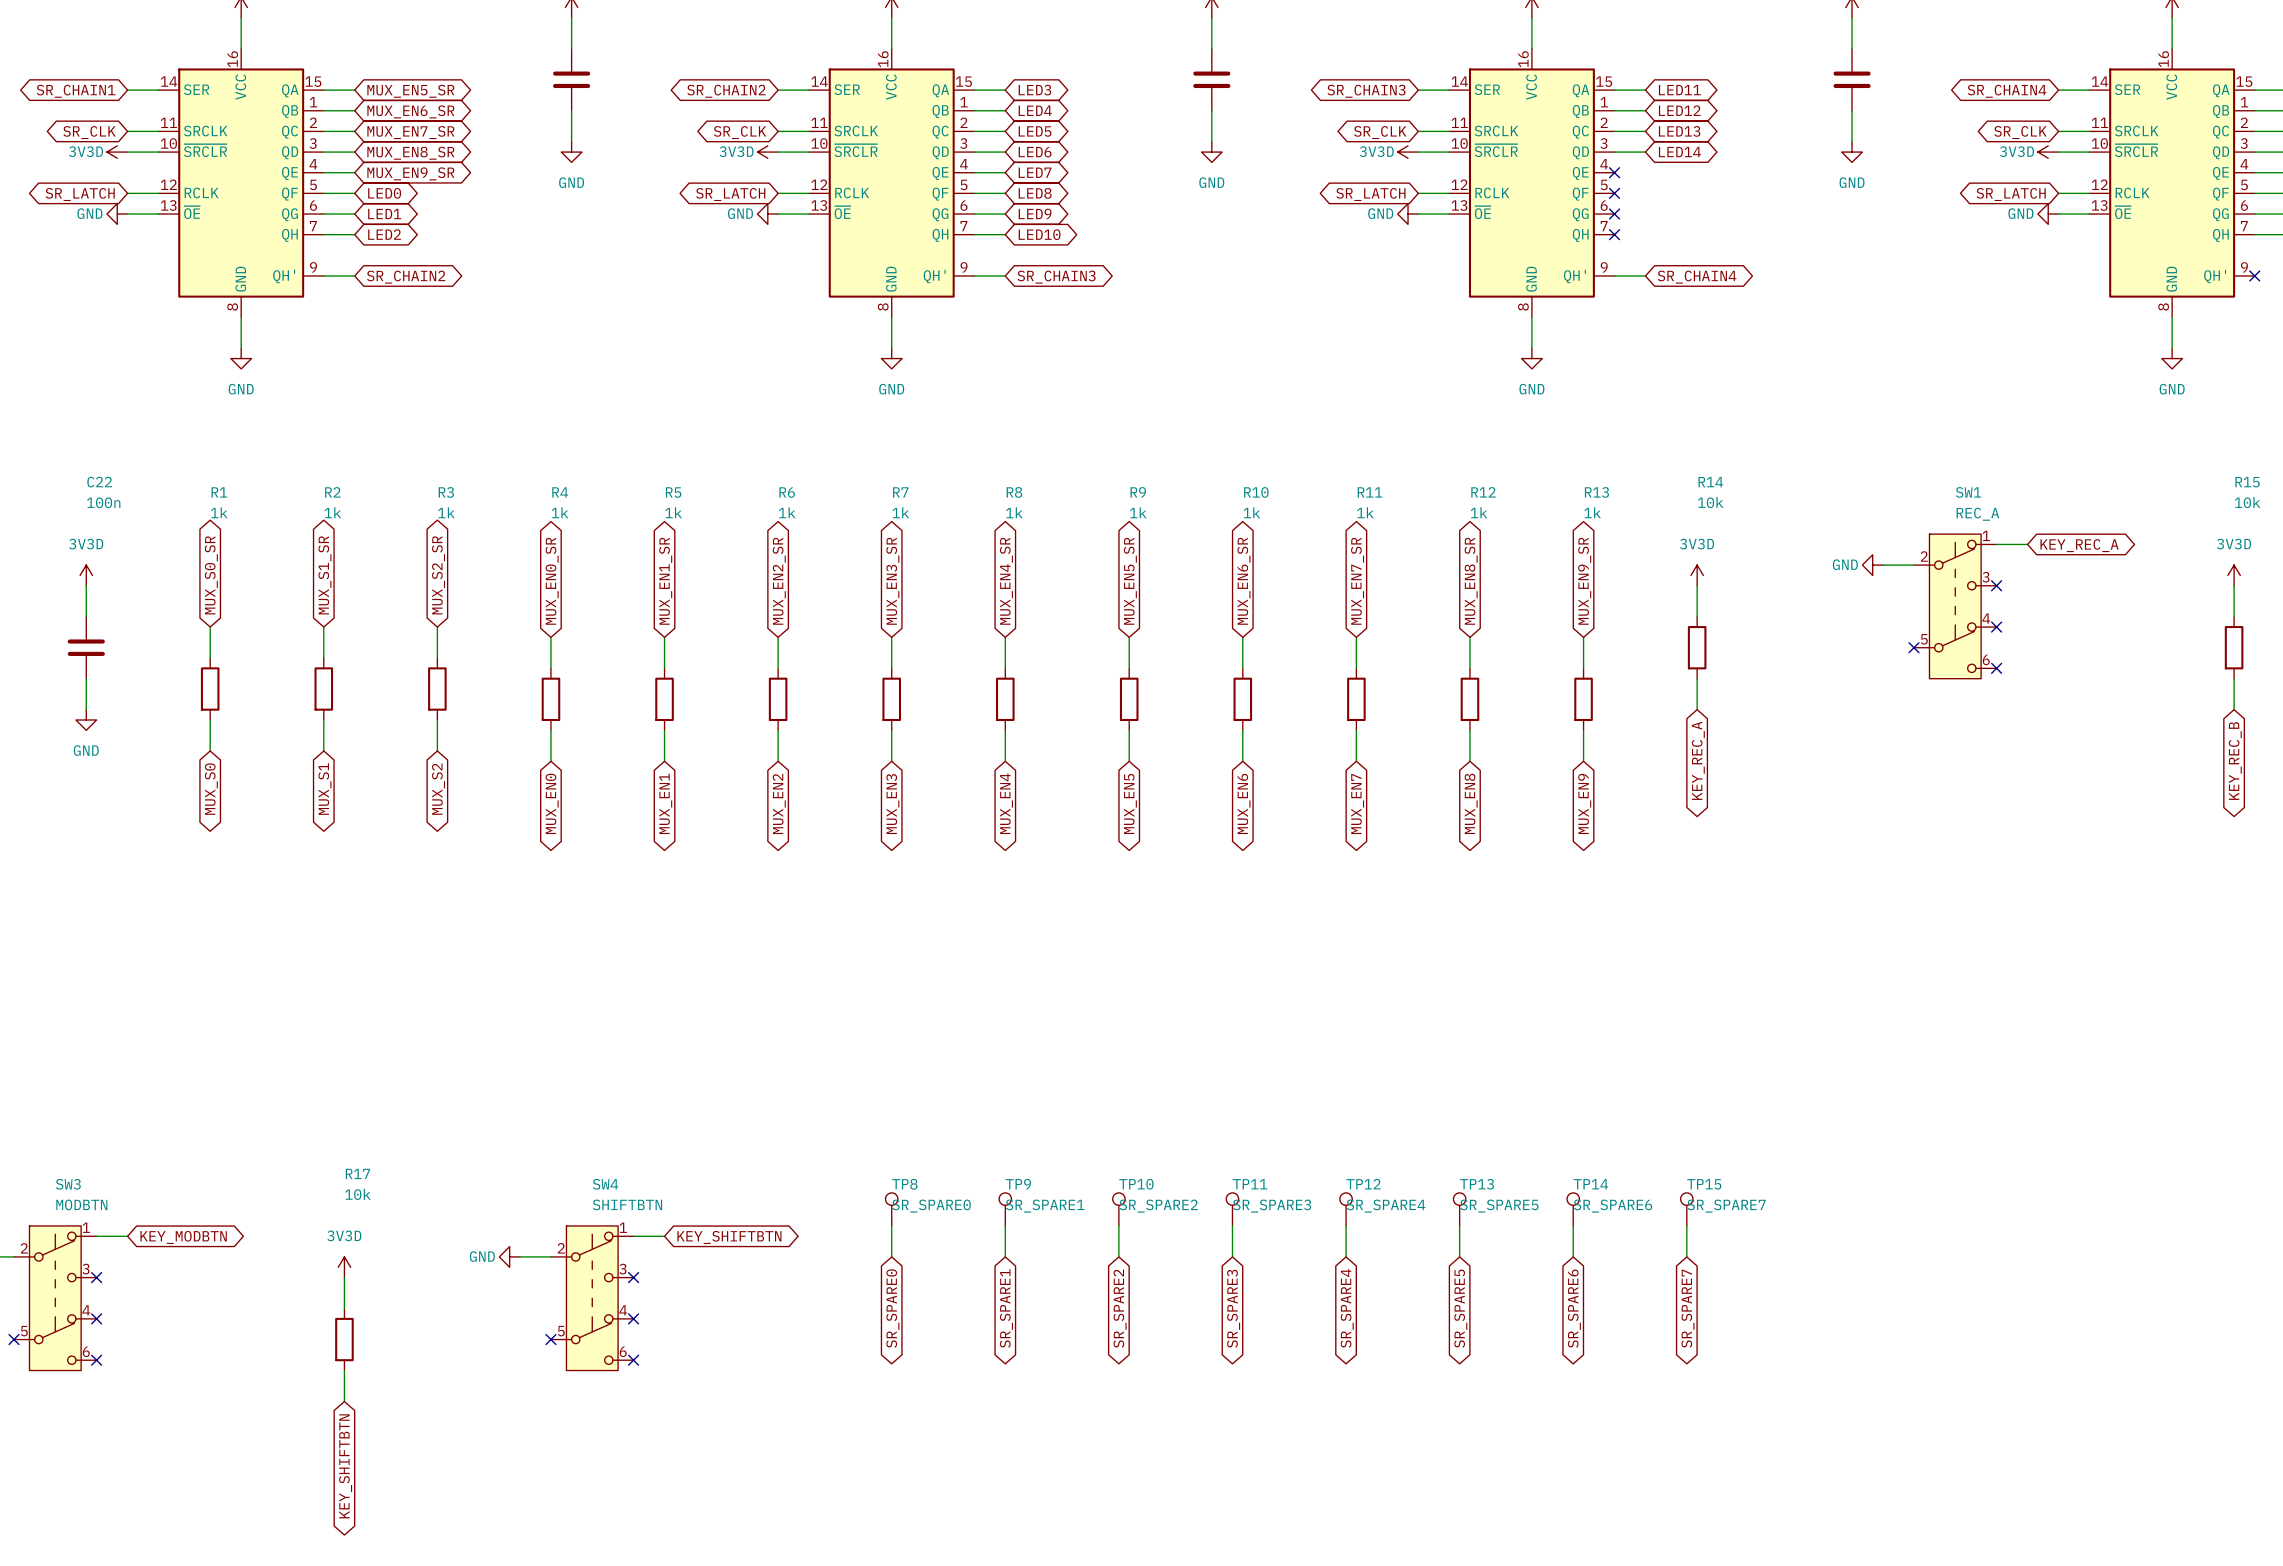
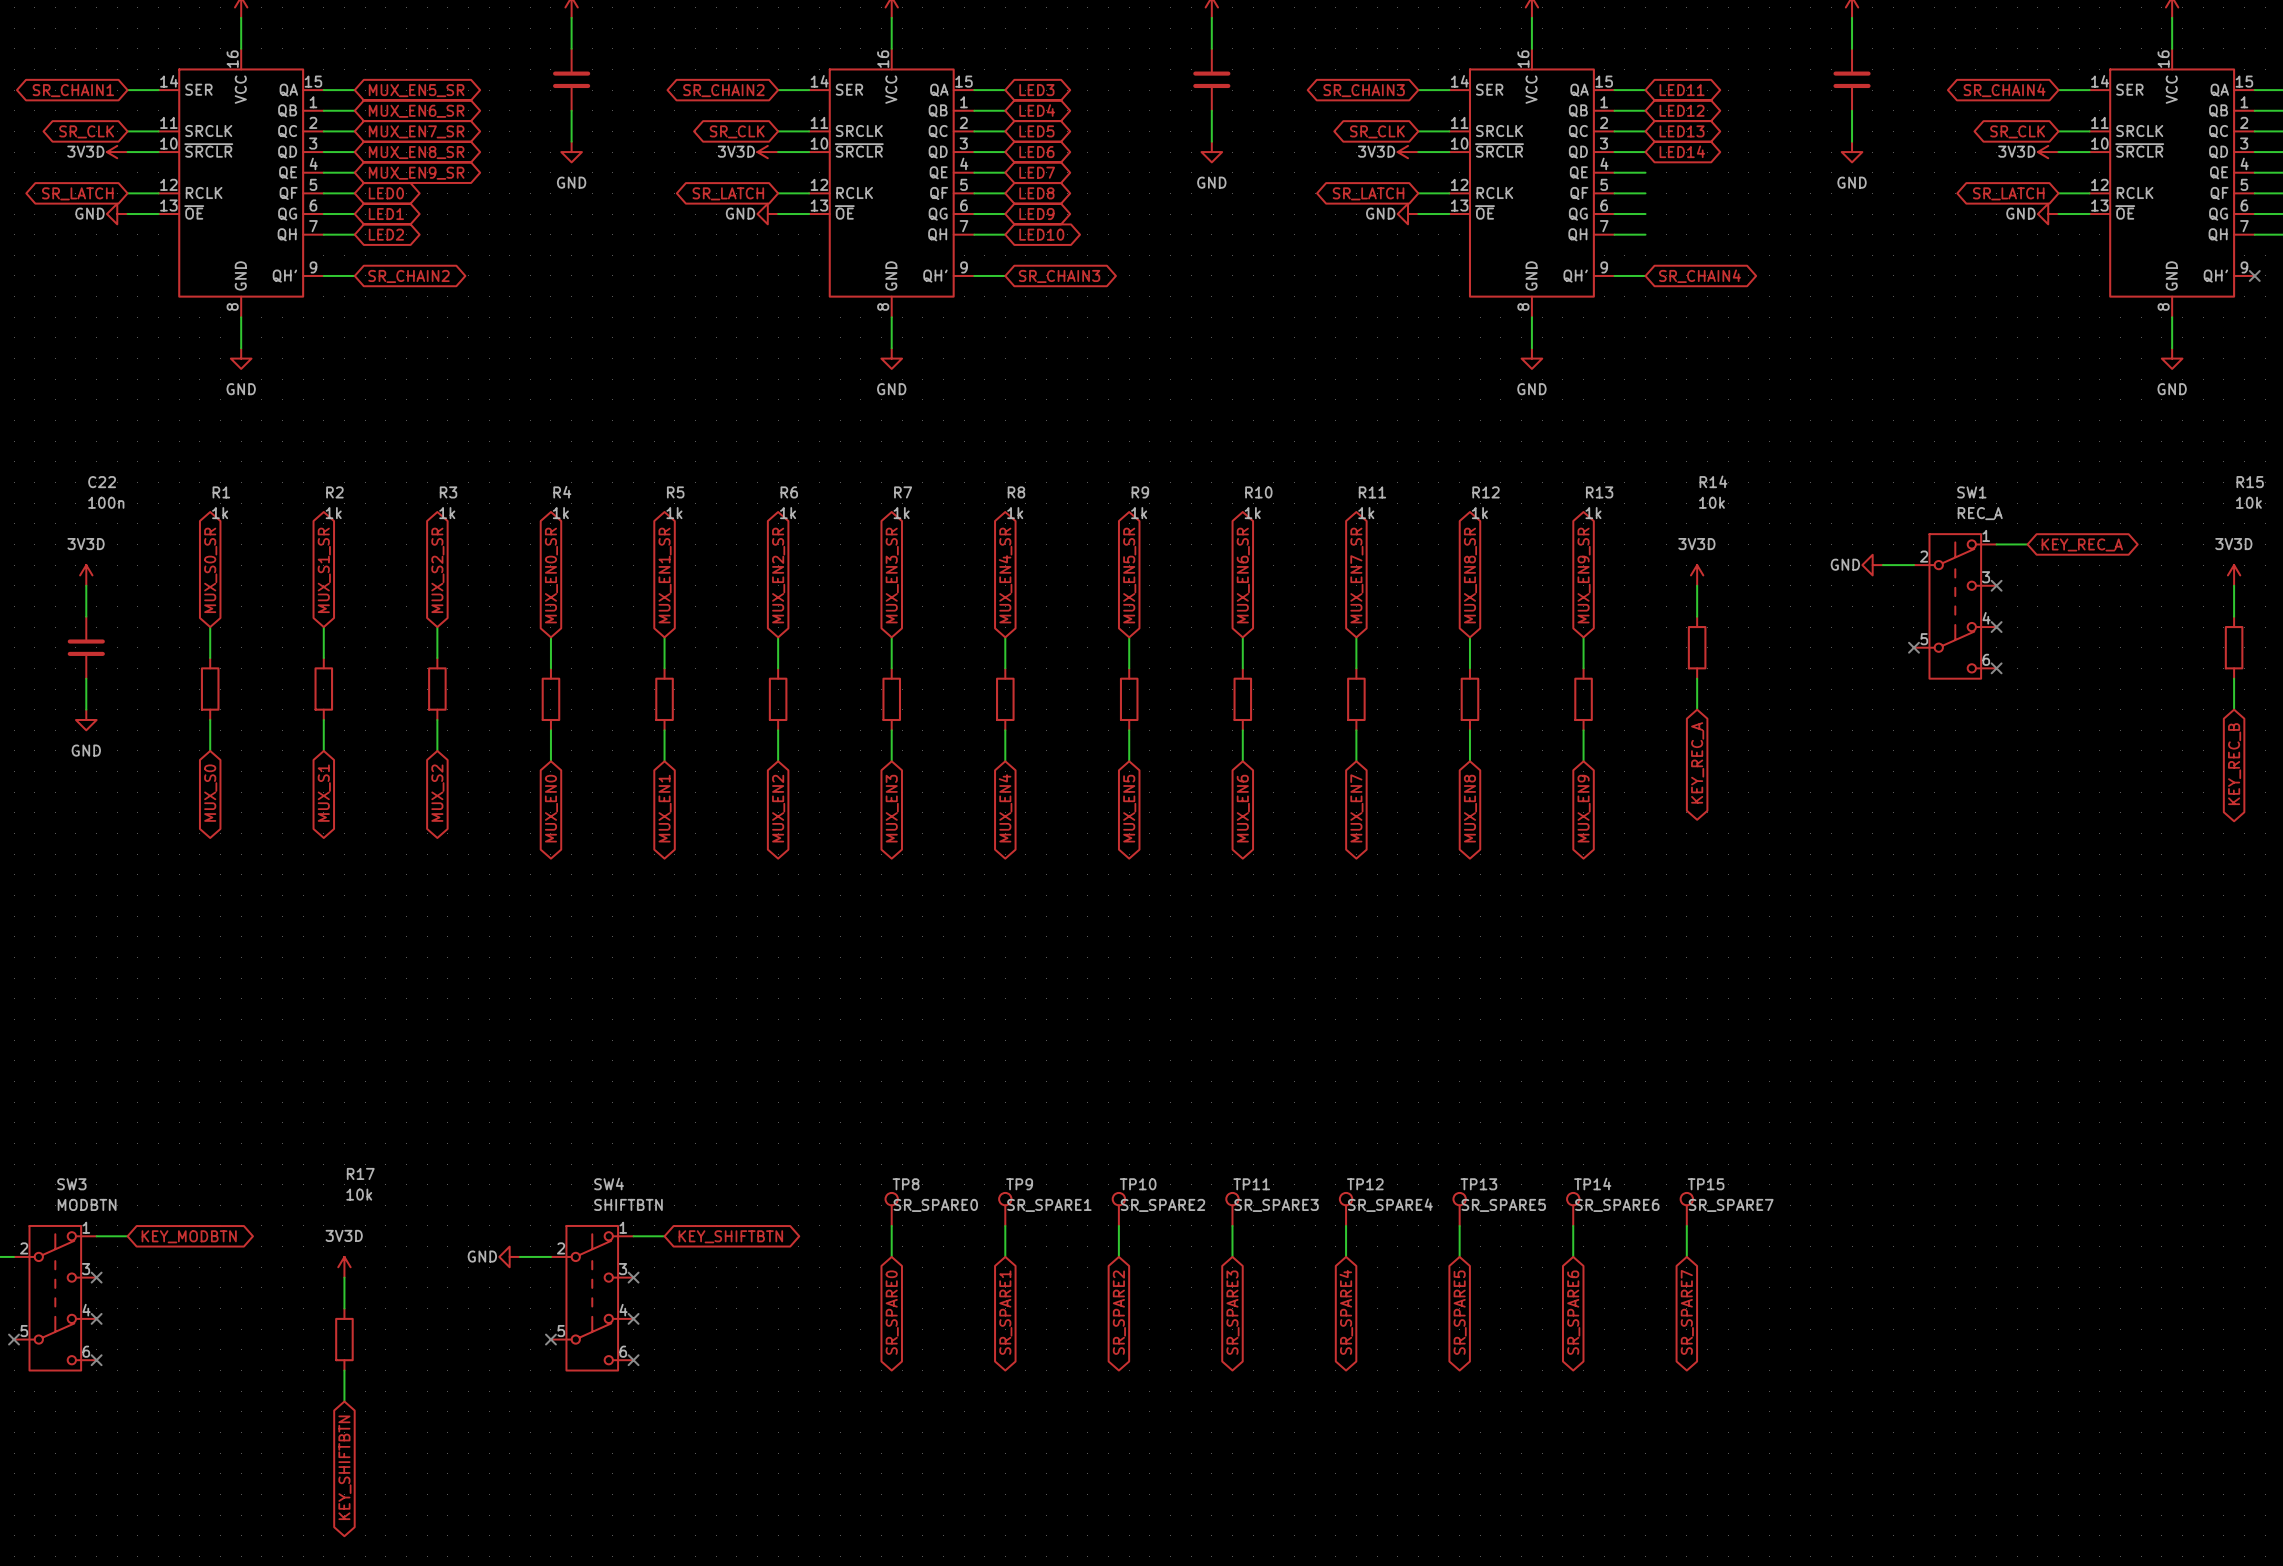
wire: none -> (1614, 172) (1645, 172)
no-connect mark: (1614, 172) -> none
wire: none -> (1614, 193) (1645, 193)
no-connect mark: (1614, 193) -> none
wire: none -> (1614, 214) (1645, 214)
no-connect mark: (1614, 214) -> none
wire: none -> (1614, 234) (1645, 234)
no-connect mark: (1614, 234) -> none

